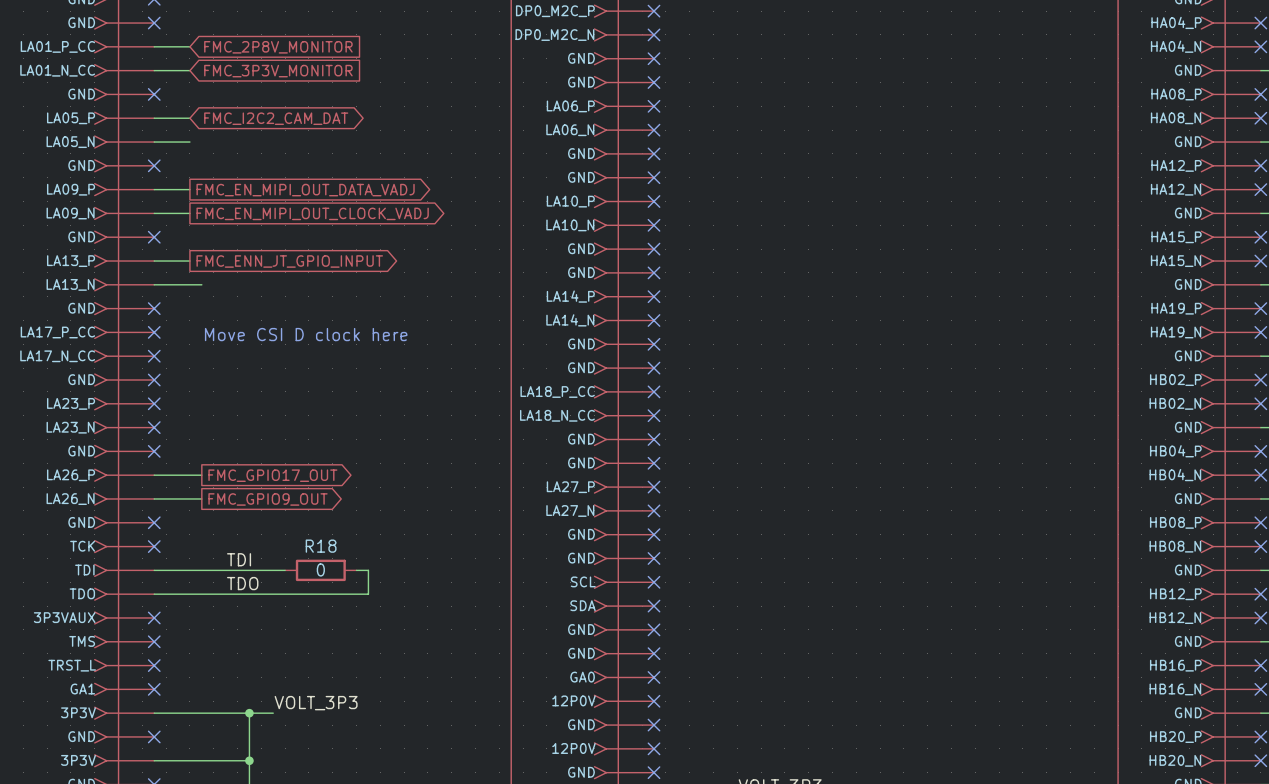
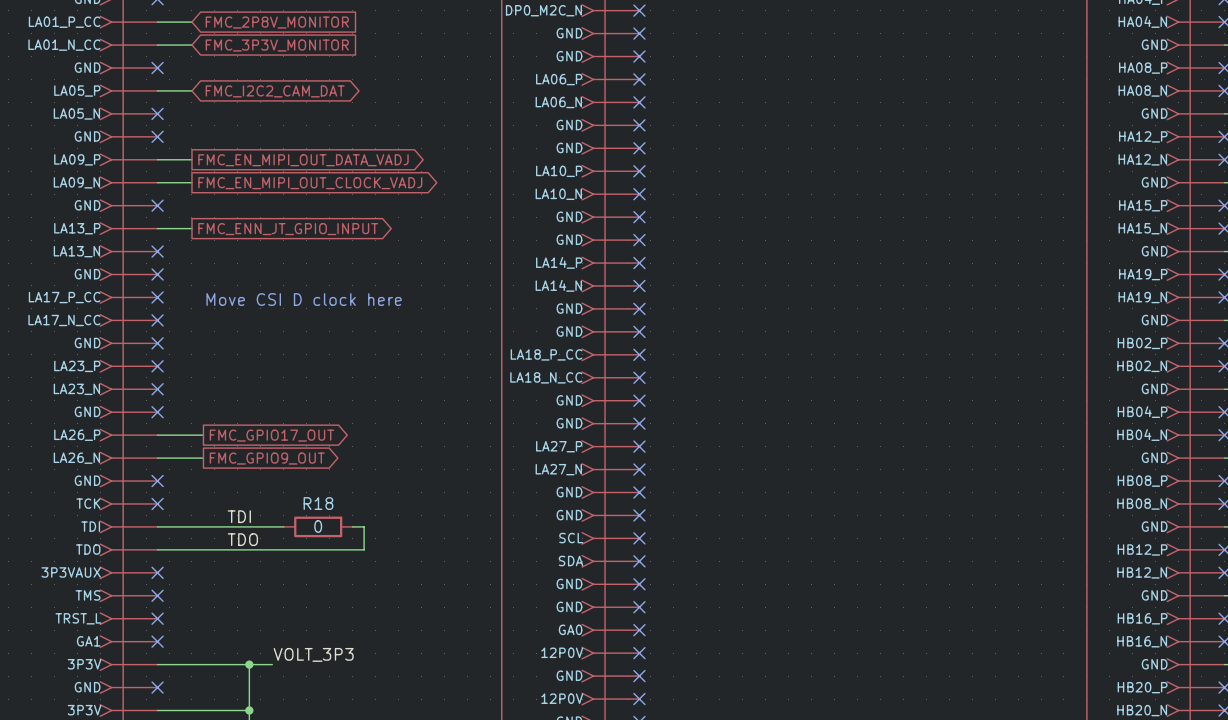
wire: (154, 142) (189, 142) -> none
no-connect mark: none -> (157, 113)
wire: (154, 284) (201, 284) -> none
no-connect mark: none -> (157, 251)

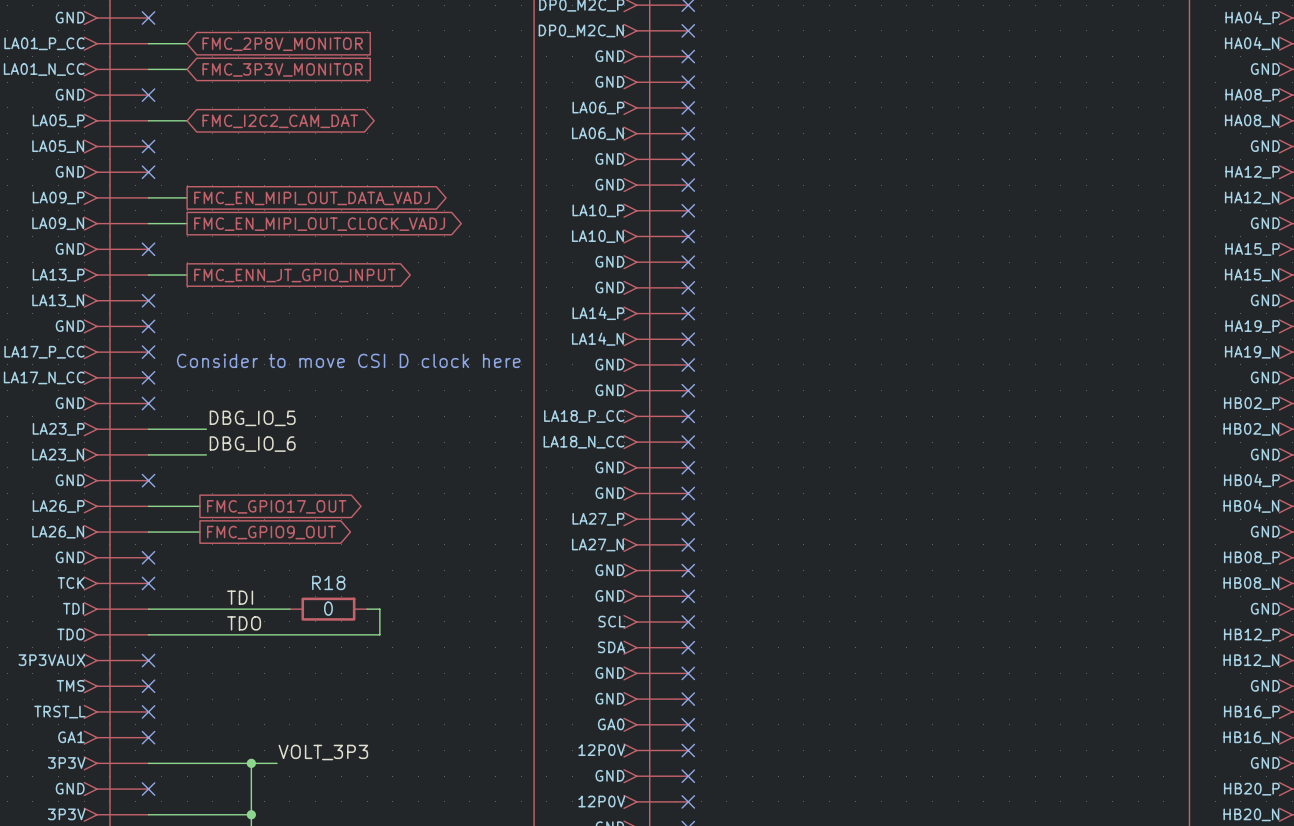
text: Move CSI D clock here (304, 299) -> Consider to move CSI D clock here (348, 360)
label: none -> DBG_IO_5 (252, 418)
wire: none -> (148, 429) (206, 429)
no-connect mark: (157, 366) -> none
label: none -> DBG_IO_6 (252, 444)
wire: none -> (148, 454) (206, 454)
no-connect mark: (157, 389) -> none

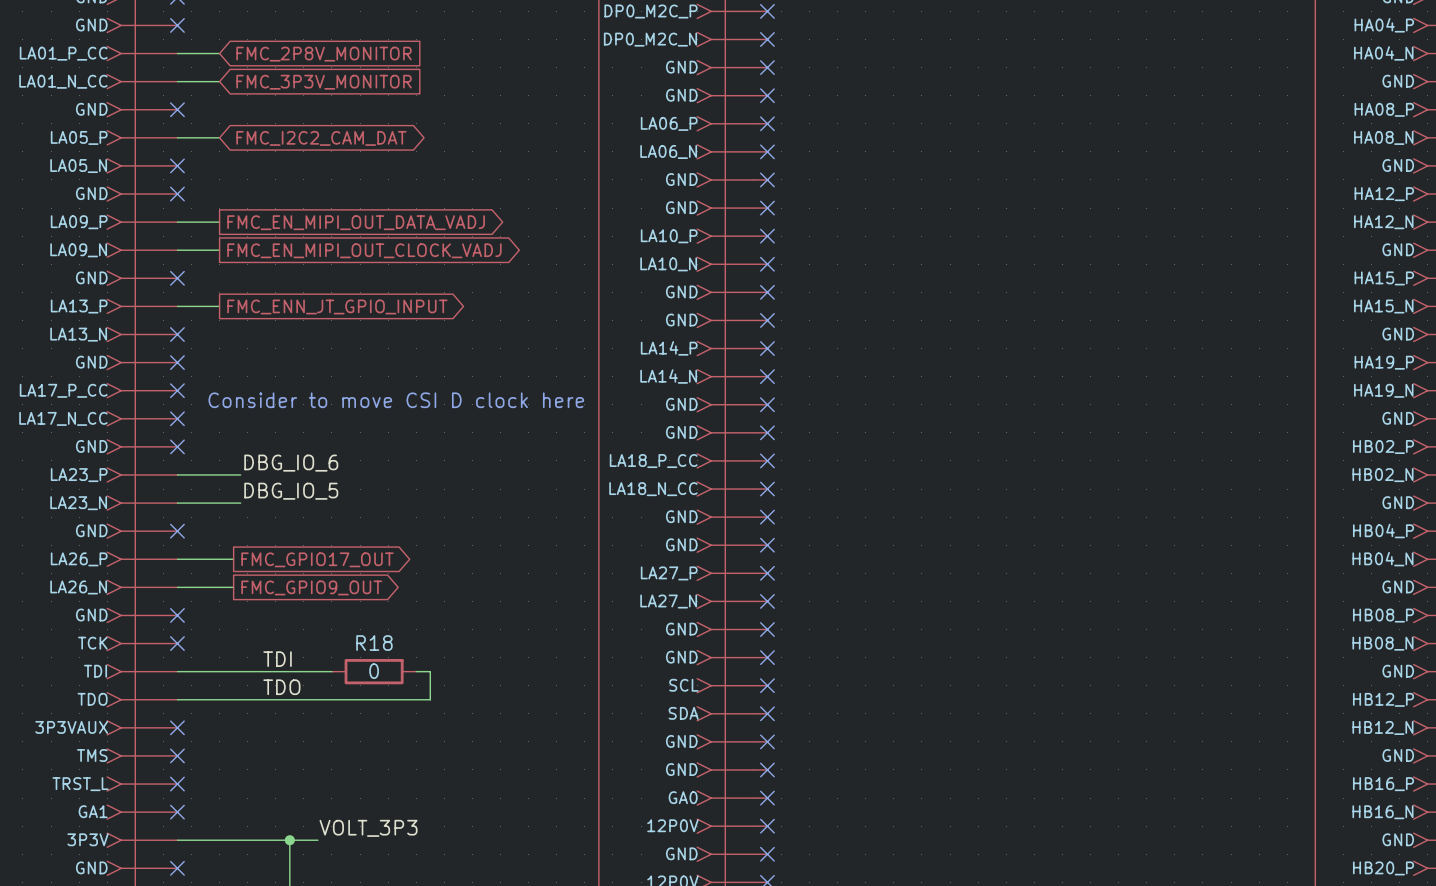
label: DBG_IO_5 (252, 418) -> DBG_IO_6 (291, 463)
label: DBG_IO_6 (252, 444) -> DBG_IO_5 (291, 491)

